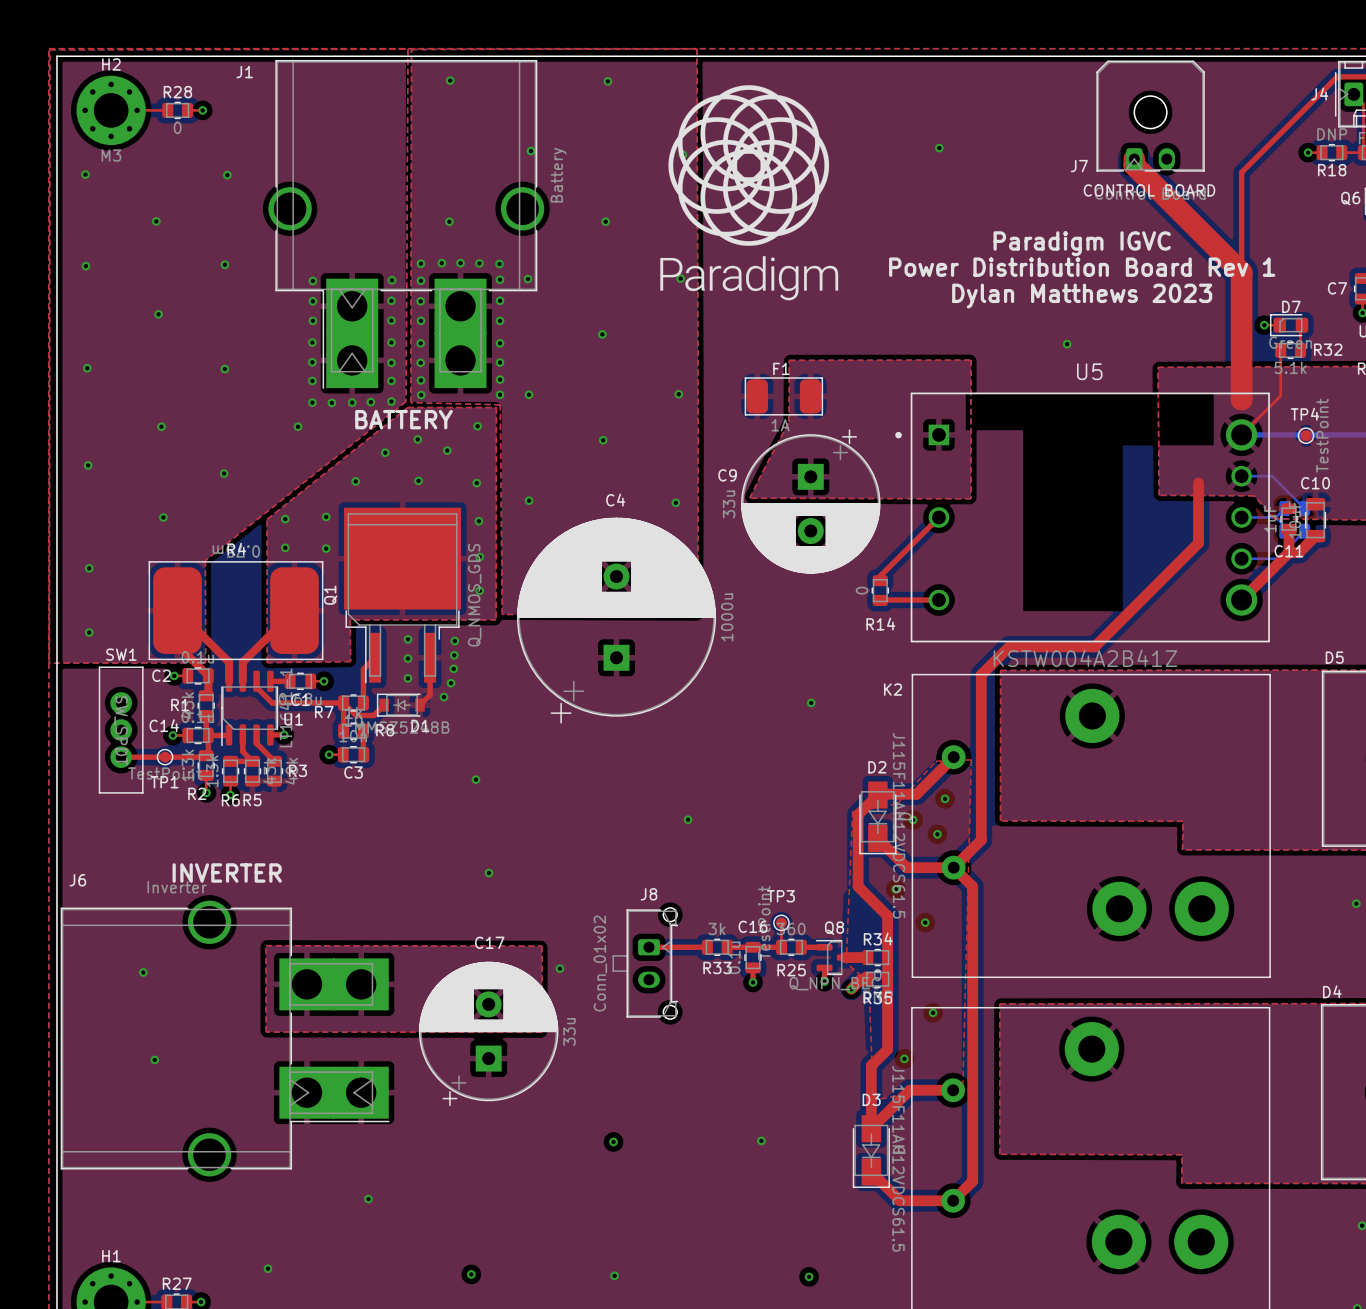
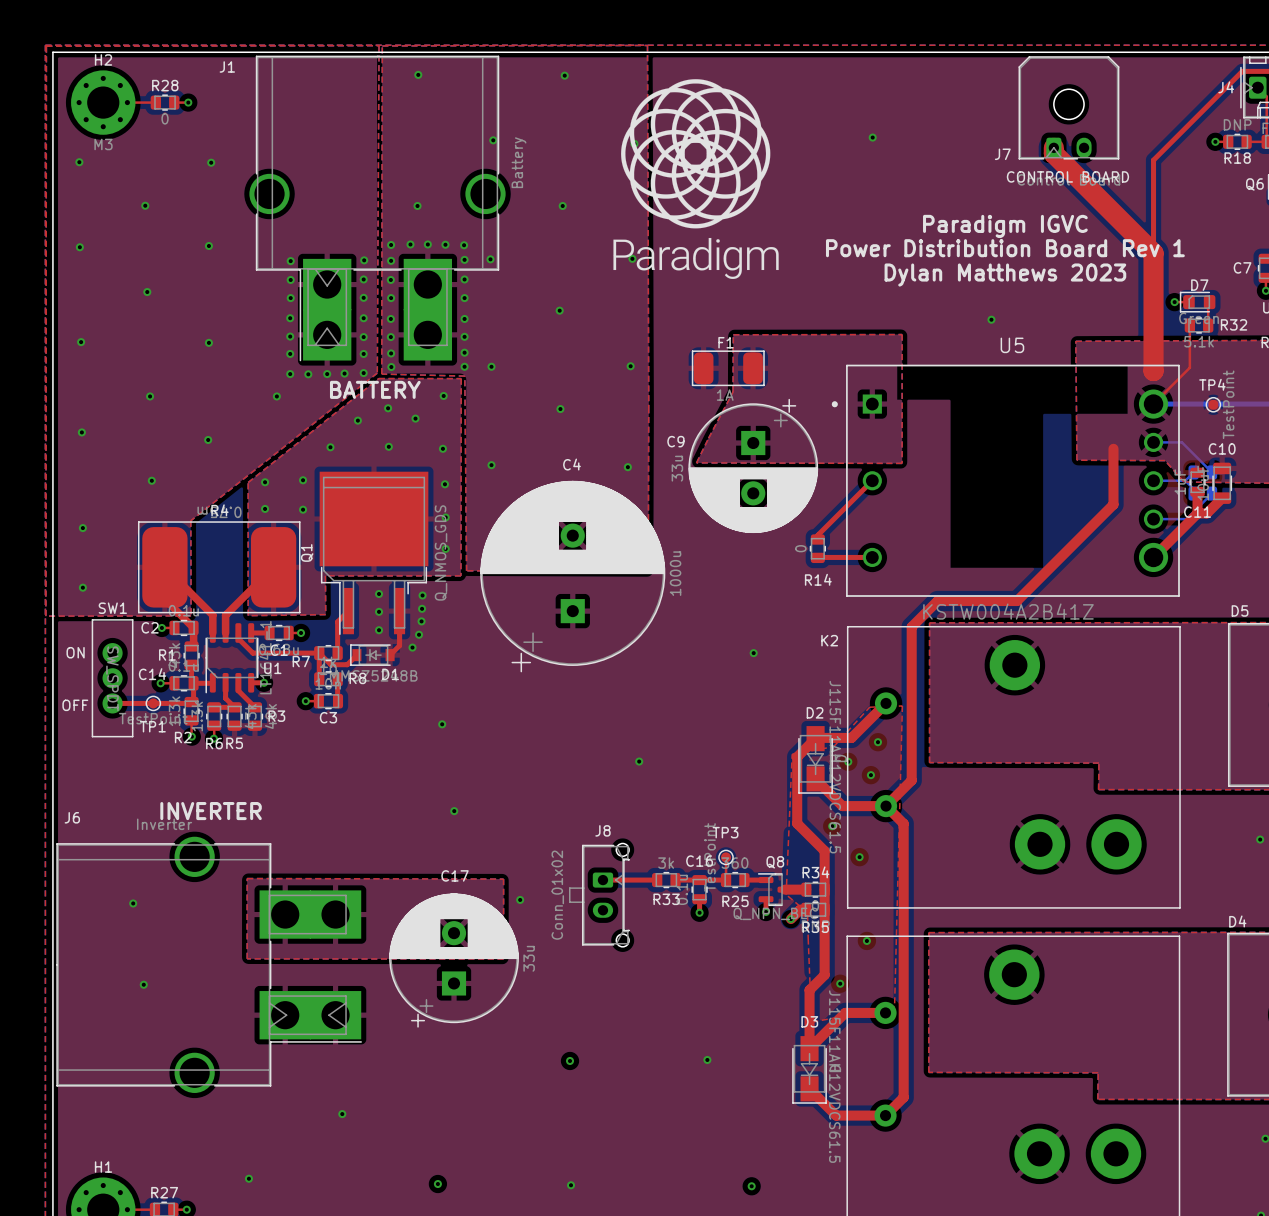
text: none -> ON (75, 652)
text: none -> OFF (75, 705)

